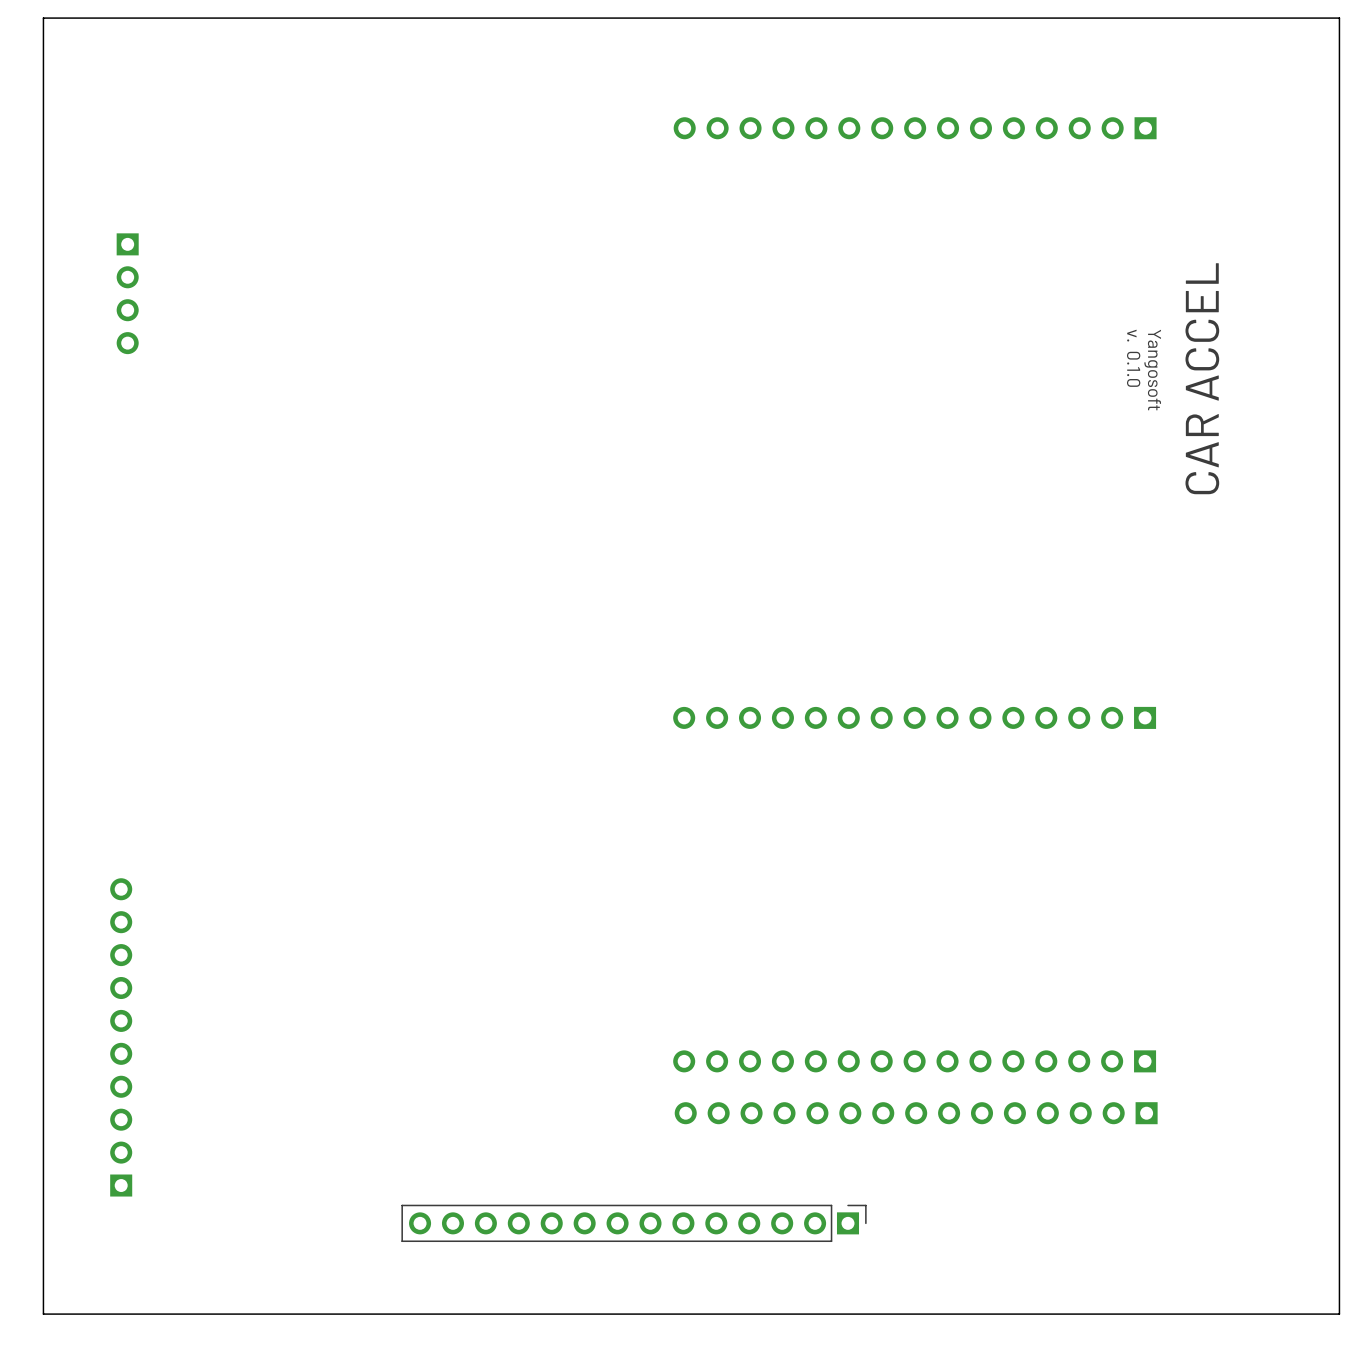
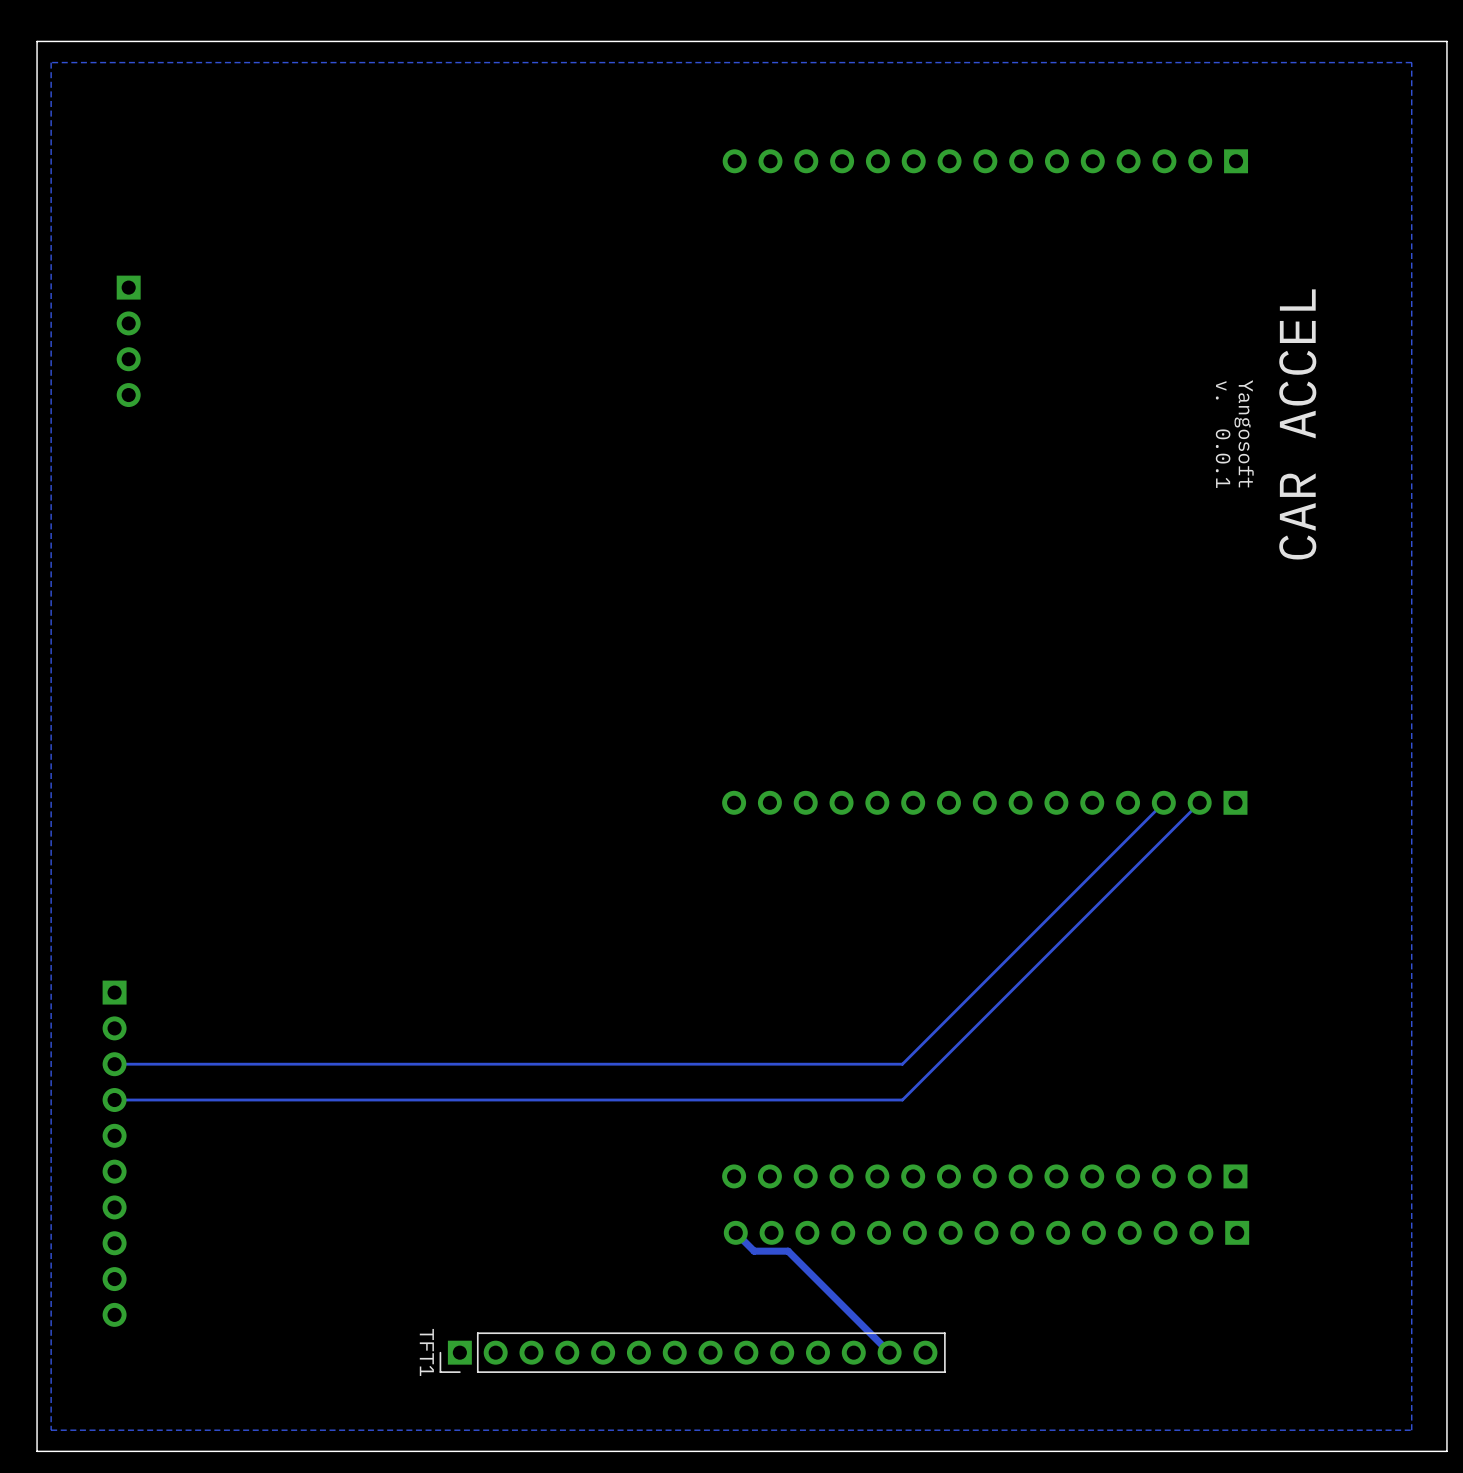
zone outline: none -> (1411, 62) (51, 62) (51, 1430) (1411, 1430) (1411, 62)
text: v. 0.1.0 (1133, 358) -> v. 0.0.1 (1223, 434)
track: none -> (1163, 802) (902, 1064) (114, 1064)
track: none -> (1199, 802) (902, 1100) (114, 1100)
part rotation: 0° (121, 1037) -> 180° (114, 1153)
track: none -> (735, 1232) (754, 1251) (788, 1251) (889, 1352)
part: (634, 1223) -> none
TFT1: none -> (692, 1352)

